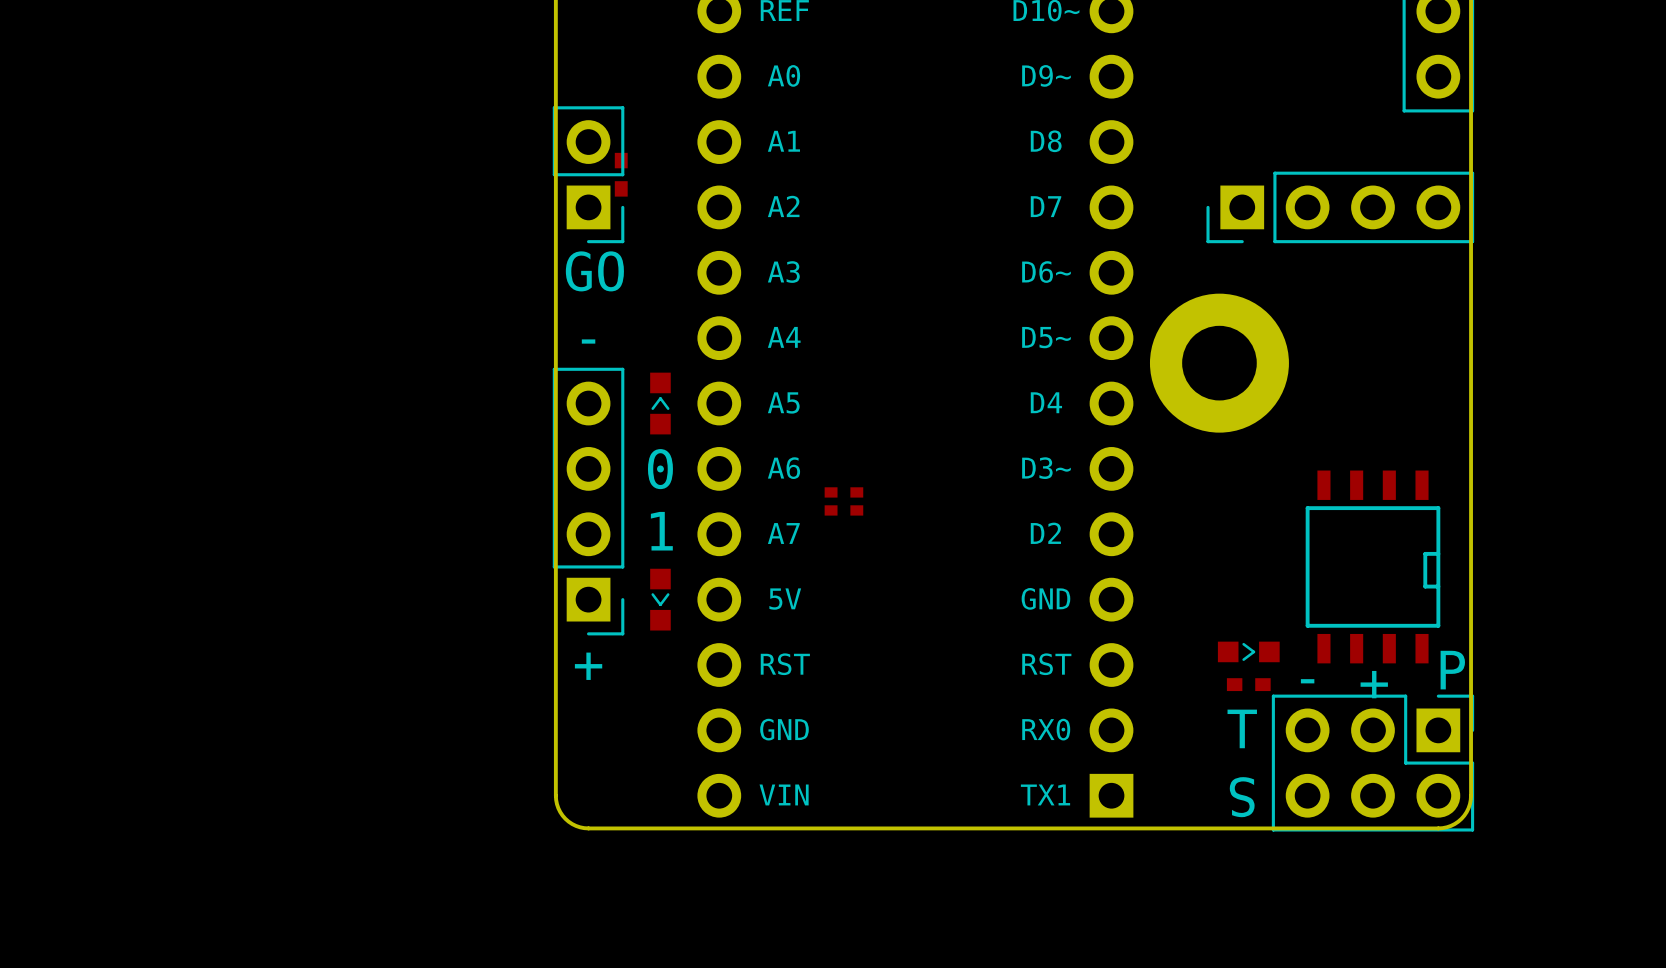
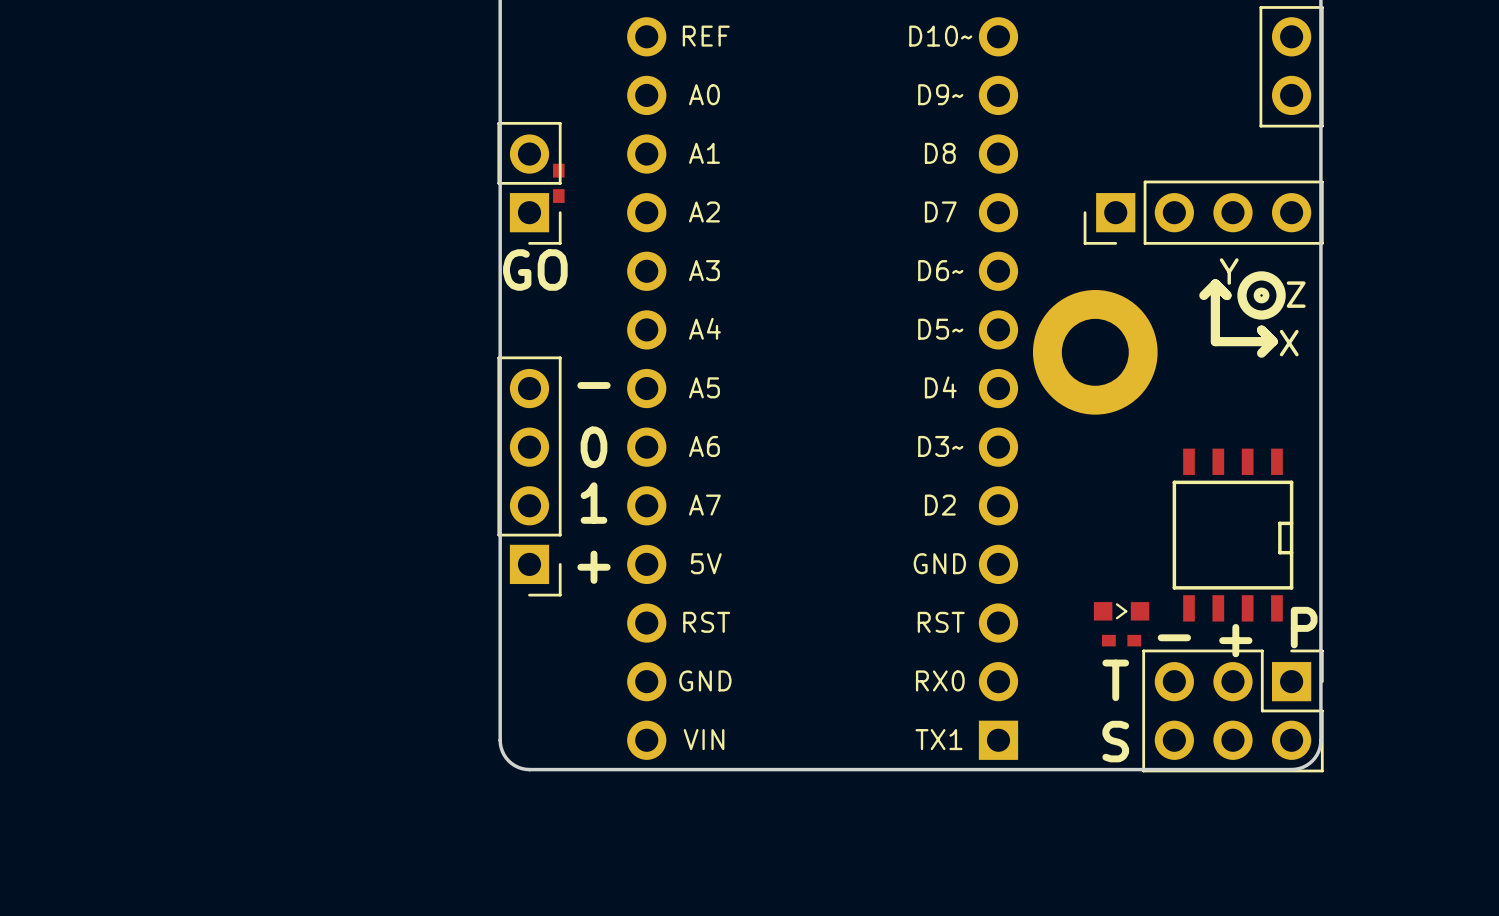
drawing: none -> [1199, 271, 1286, 358]
text position: - (588, 341) -> - (593, 385)
part: (660, 403) -> none
part: (843, 501) -> none
part: (660, 599) -> none
text position: + (588, 666) -> + (593, 567)

